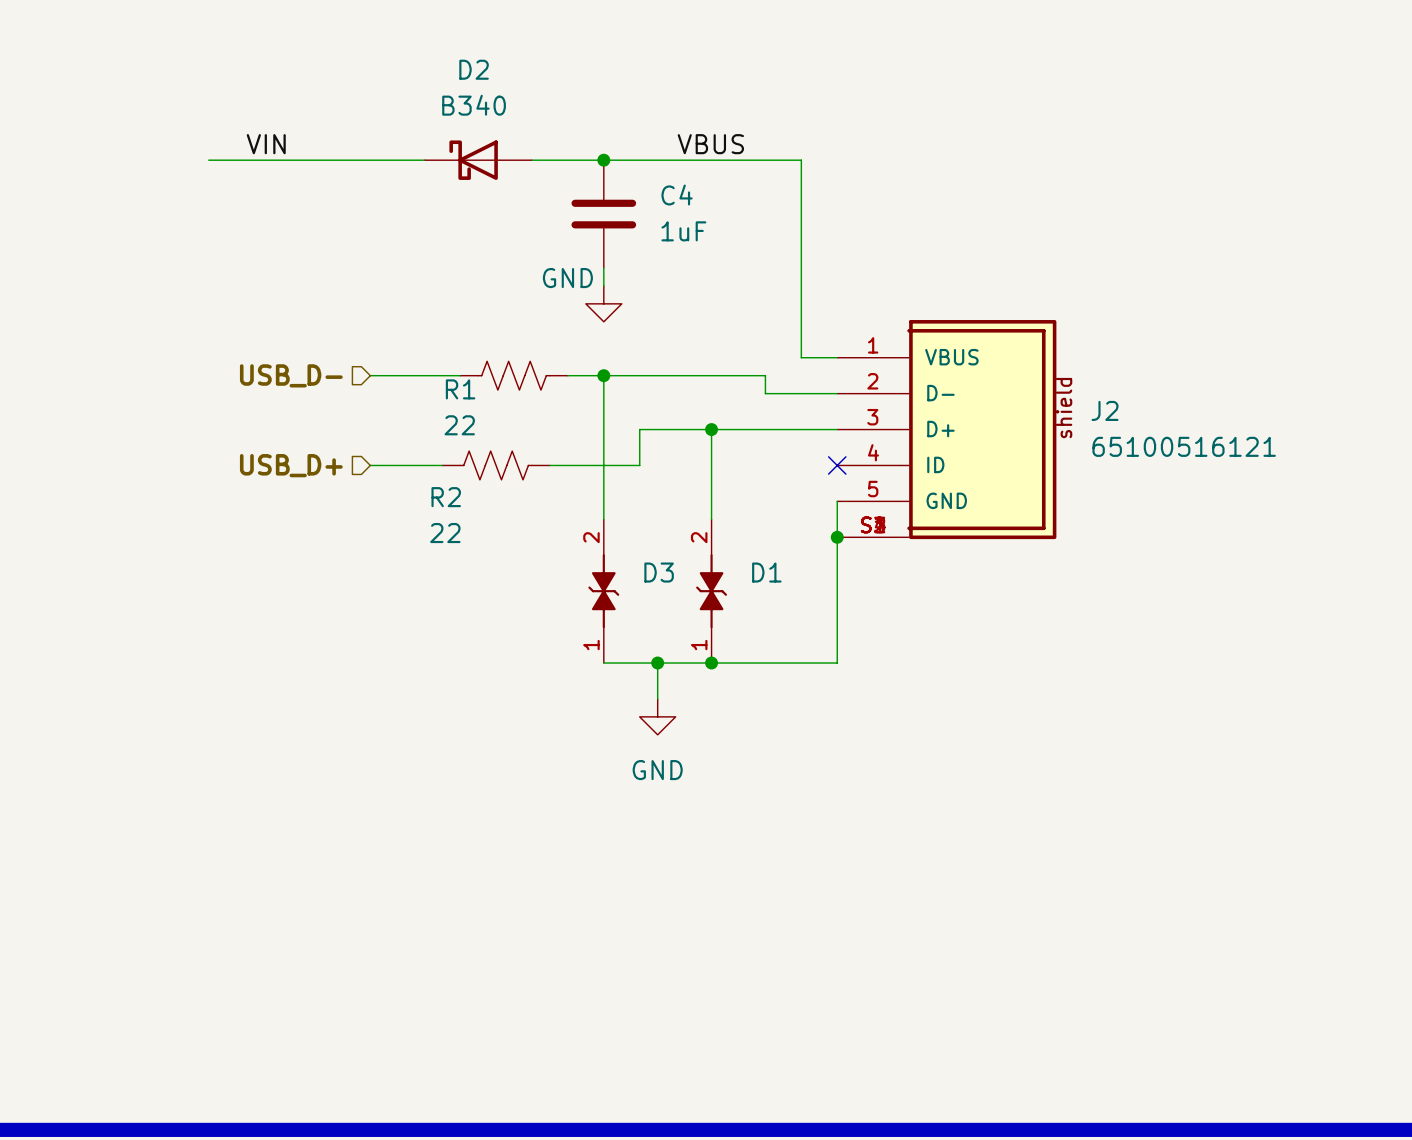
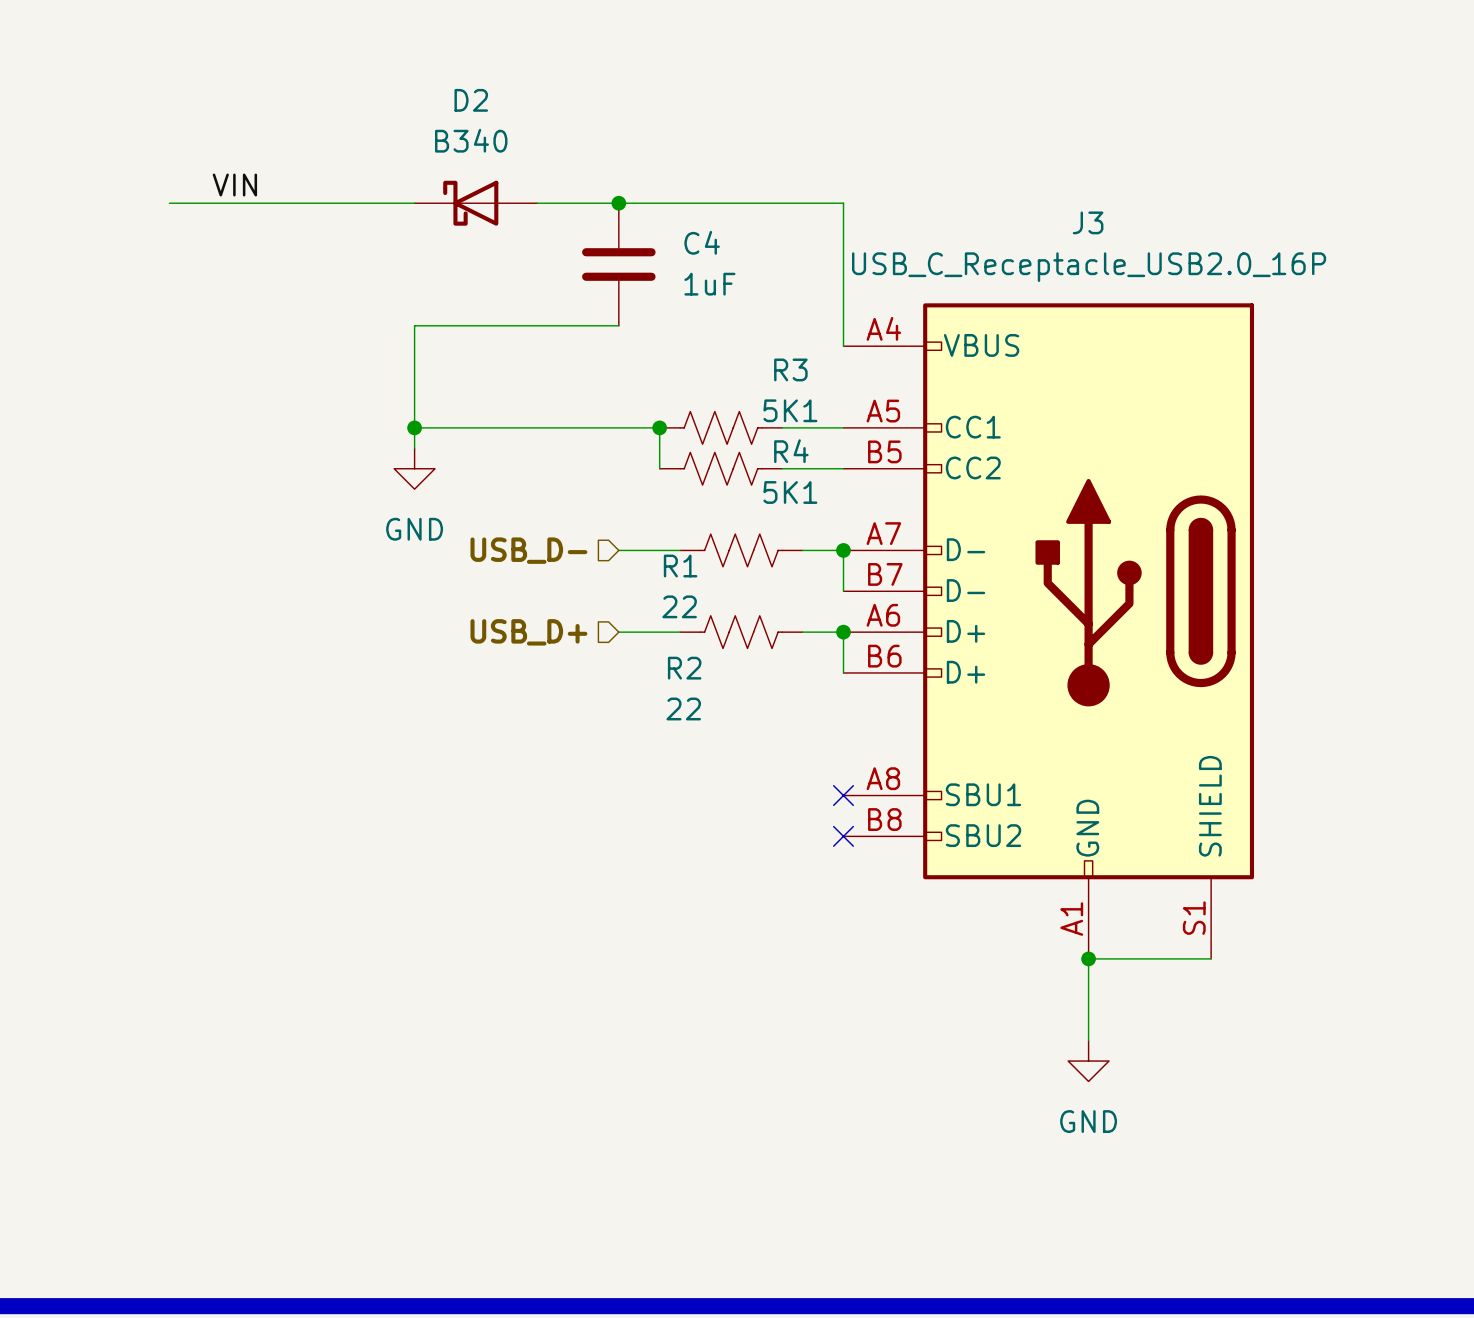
label: VBUS (710, 144) -> none
wire: (603, 267) (603, 285) -> (618, 325) (414, 325) (414, 448)
wire: (801, 285) (801, 357) (837, 357) -> none
power symbol: GND (603, 303) -> none
wire: none -> (414, 427) (659, 427) (659, 468)
junction: none -> (414, 427)
R3: none -> 5K1 (720, 427)
wire: none -> (782, 427) (843, 427)
hierarchical label position: USB_D- (291, 375) -> USB_D- (528, 550)
wire: (370, 375) (460, 375) -> none
R1 position: (514, 375) -> (741, 550)
wire: (567, 375) (765, 375) (765, 393) -> (782, 468) (802, 468)
wire: (603, 375) (603, 519) -> none
junction position: (603, 375) -> (659, 427)
power symbol: none -> GND (414, 468)
R4: none -> 5K1 (720, 468)
wire: (711, 429) (711, 519) -> none
junction: (711, 429) -> none
wire: (837, 429) (639, 429) (639, 465) -> (680, 550) (659, 550)
J2: 65100516121 (946, 429) -> none
hierarchical label position: USB_D+ (291, 465) -> USB_D+ (528, 632)
wire: (370, 465) (442, 465) -> none
R2 position: (496, 465) -> (741, 632)
wire: (549, 465) (603, 465) -> (618, 632) (680, 632)
wire: none -> (802, 550) (843, 550) (843, 591)
junction: none -> (843, 550)
no-connect mark: (837, 465) -> none
wire: (837, 501) (837, 663) (603, 663) -> none
J3: none -> USB_C_Receptacle_USB2.0_16P (1048, 631)
wire: none -> (802, 632) (843, 632) (843, 672)
junction position: (837, 537) -> (843, 632)
D3: (603, 591) -> none
D1: (711, 591) -> none
wire: (657, 663) (657, 698) -> none
junction: (657, 663) -> none
junction: (711, 663) -> none
no-connect mark: none -> (843, 795)
power symbol: GND (657, 716) -> none
no-connect mark: none -> (843, 836)
junction: none -> (1088, 958)
wire: none -> (1211, 958) (1088, 958) (1088, 1040)
power symbol: none -> GND (1088, 1061)

